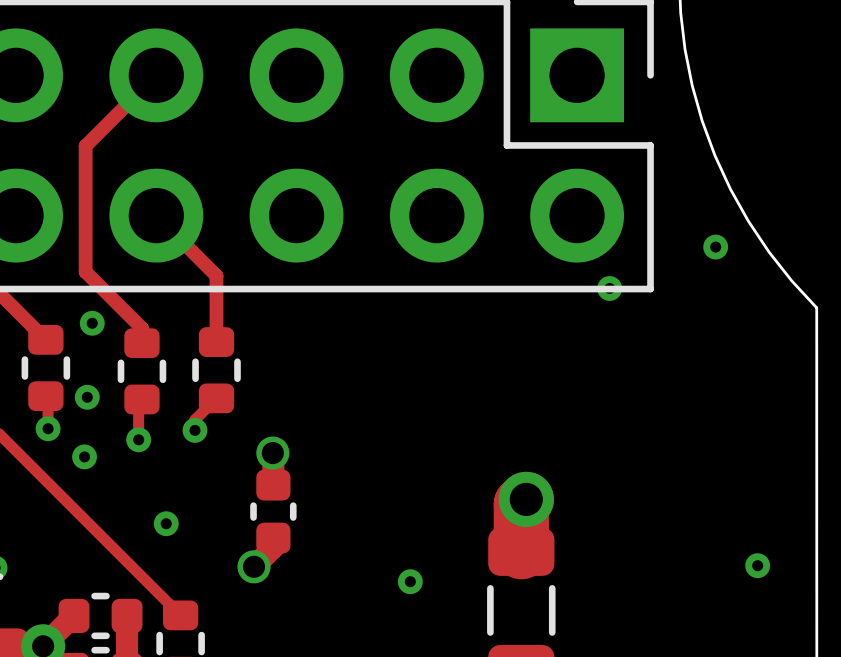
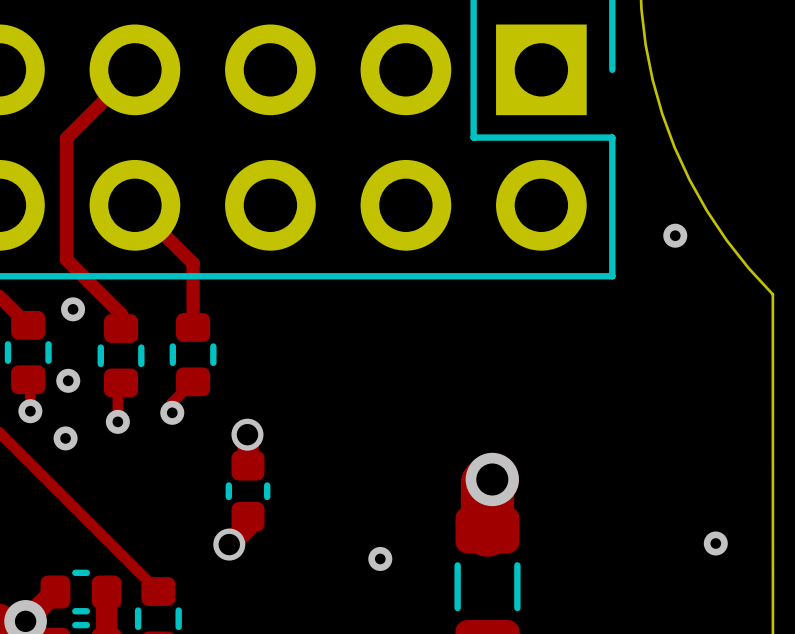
via: (609, 288) -> none
via: (166, 523) -> none

